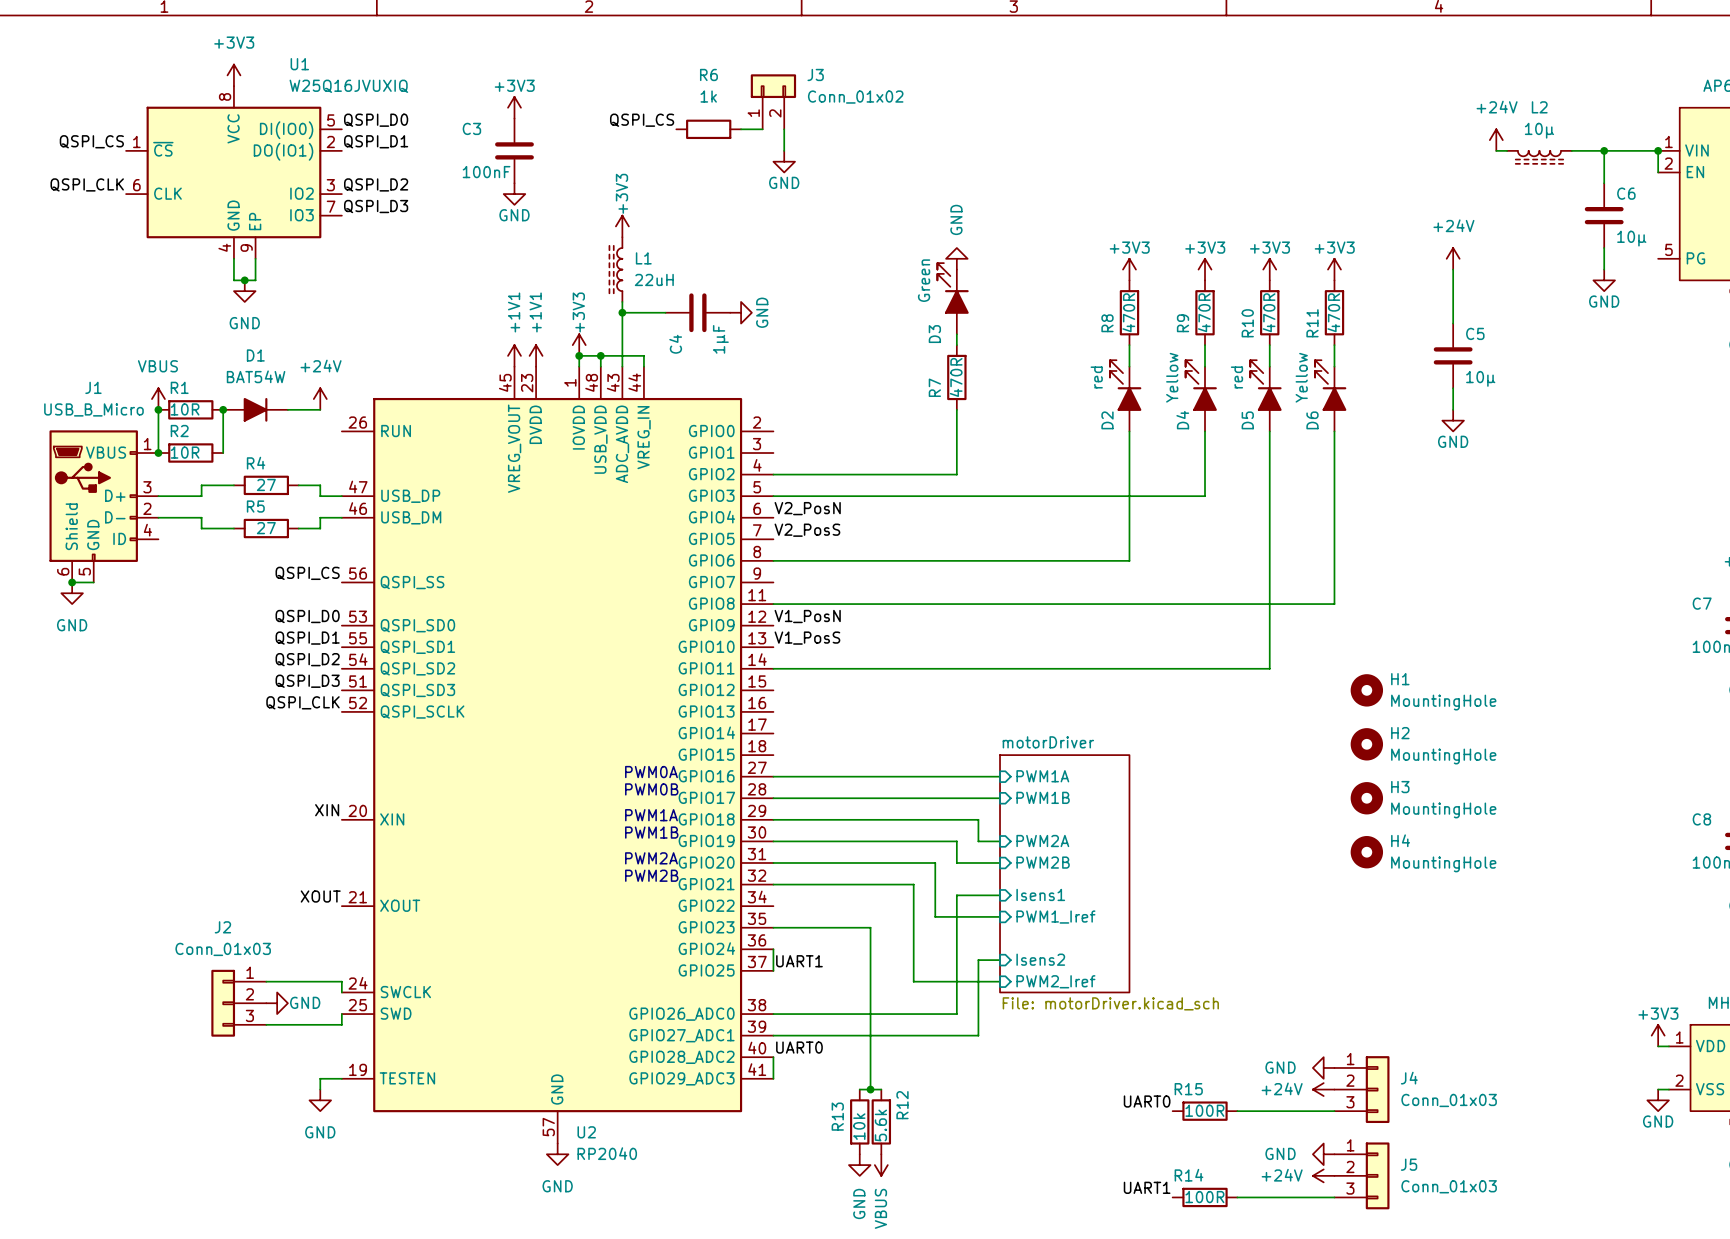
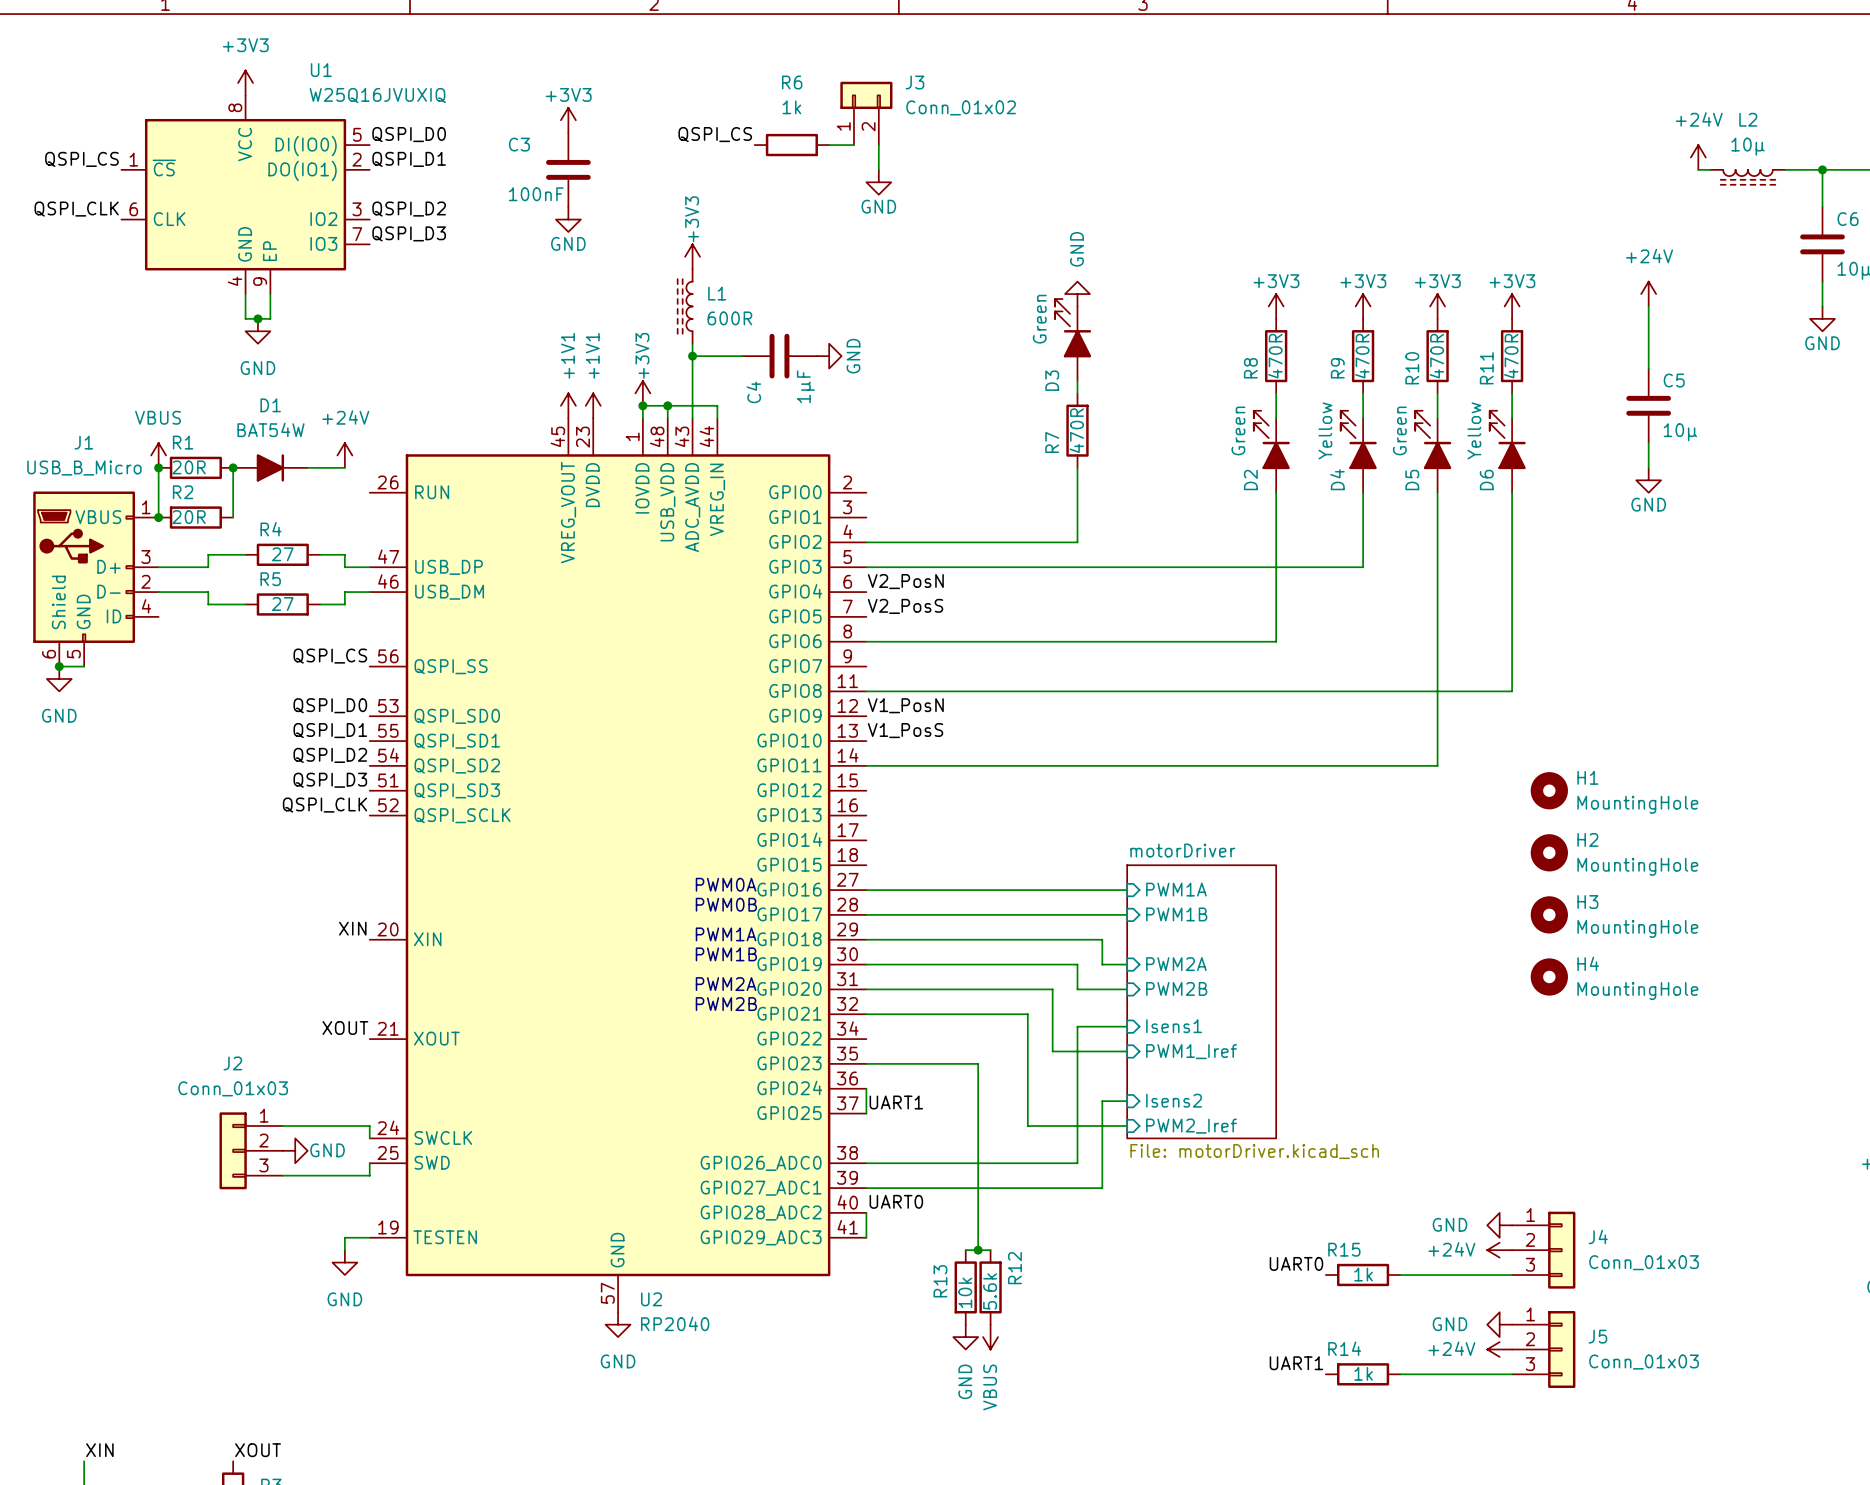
L1 value: 22uH (654, 279) -> 600R (729, 318)
D2 value: red (1096, 377) -> Green (1238, 430)
D5 value: red (1236, 377) -> Green (1399, 430)
R1 value: 10R (185, 409) -> 20R (188, 467)
R2 value: 10R (185, 452) -> 20R (188, 517)
R15 value: 100R (1204, 1110) -> 1k (1363, 1274)
R14 value: 100R (1204, 1197) -> 1k (1363, 1373)

